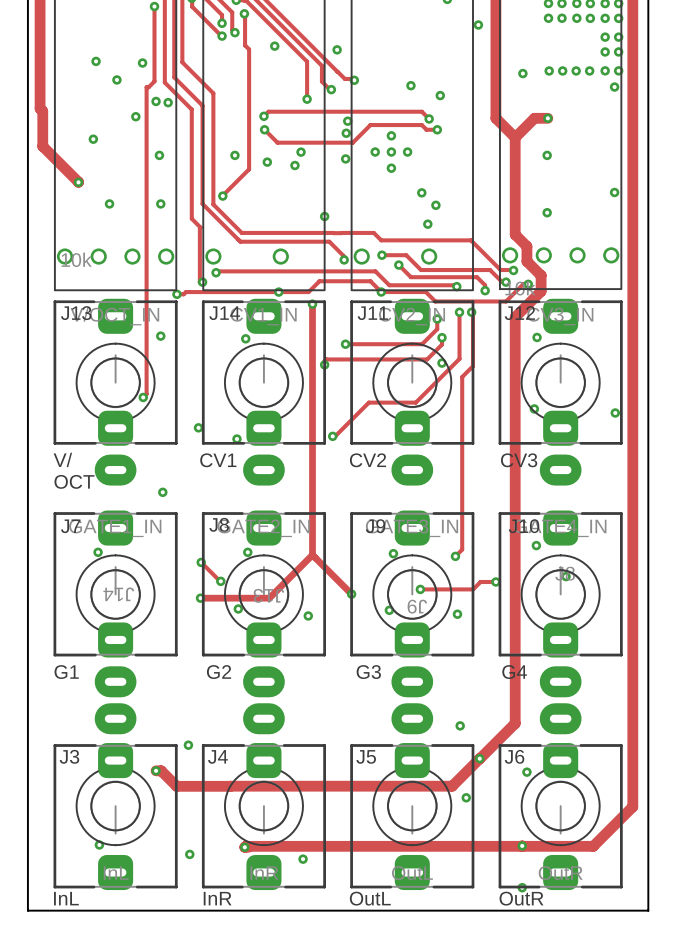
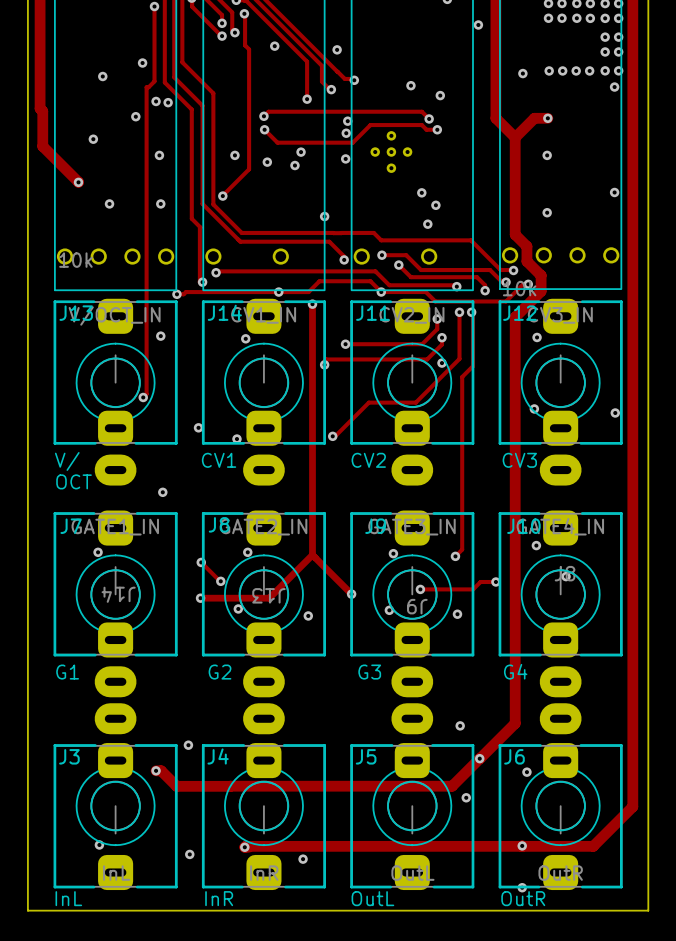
via: (96, 61) -> none
via: none -> (102, 76)
via: (116, 79) -> none

